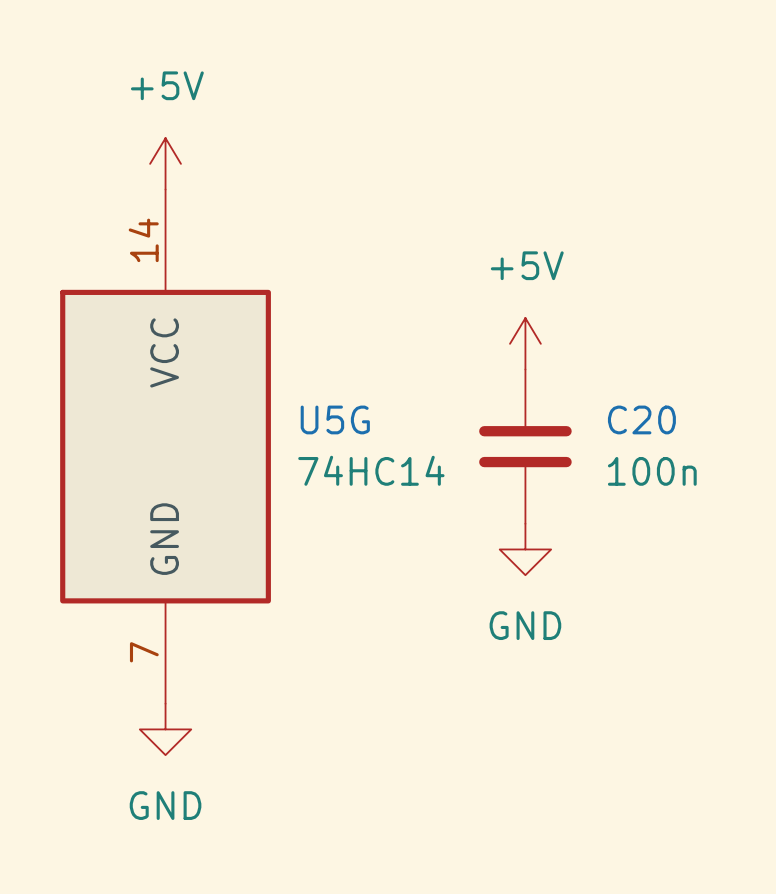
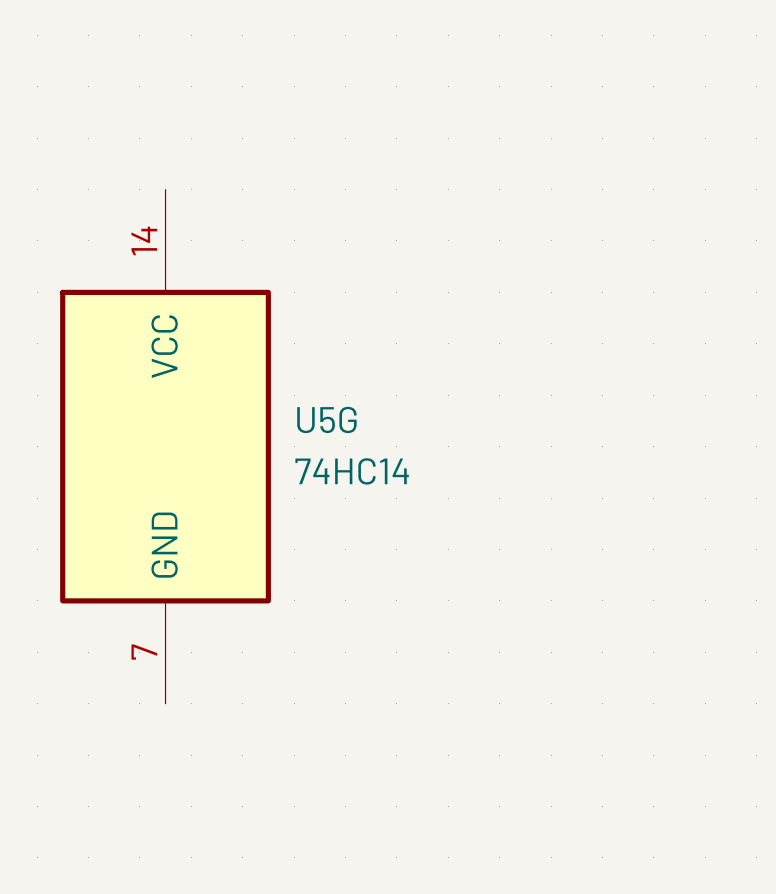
power symbol: +5V (165, 163) -> none
power symbol: +5V (525, 343) -> none
C20: 100n (525, 446) -> none
power symbol: GND (525, 549) -> none
power symbol: GND (165, 729) -> none

